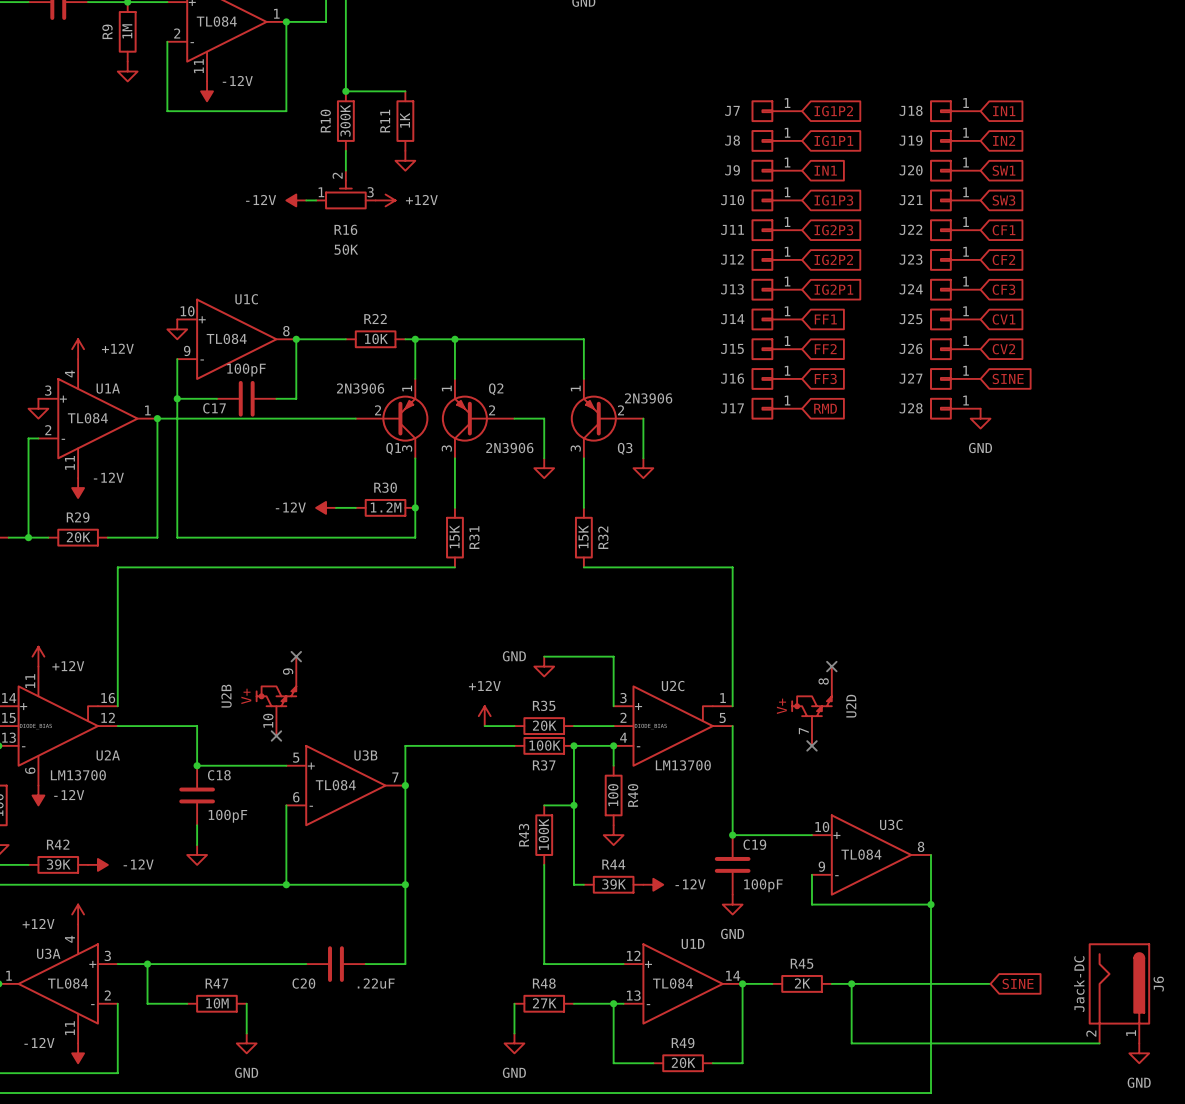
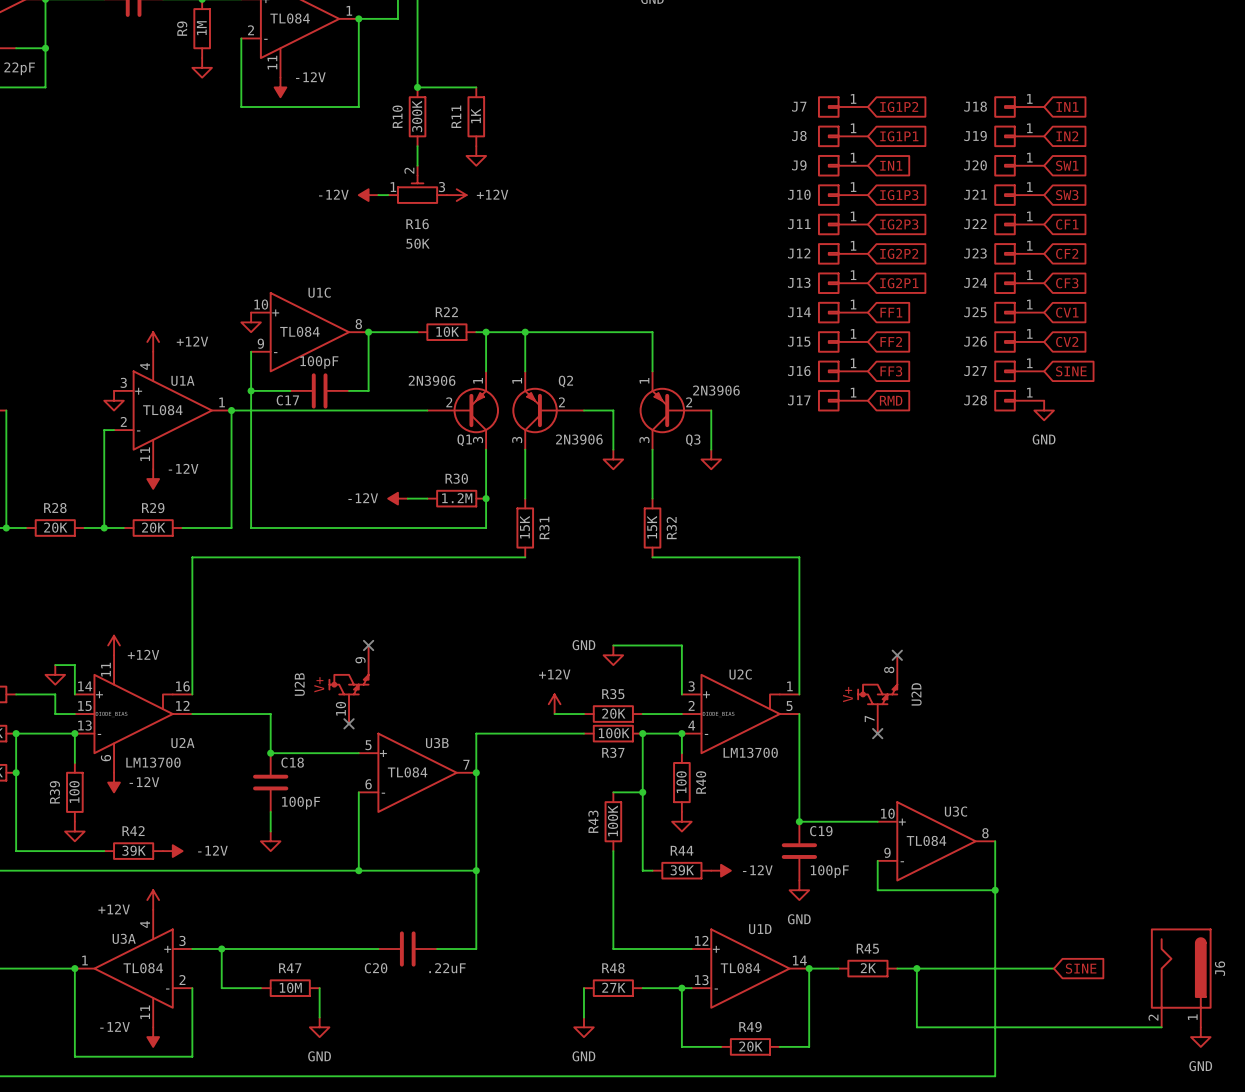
J6 value: Jack-DC (1079, 984) -> none

